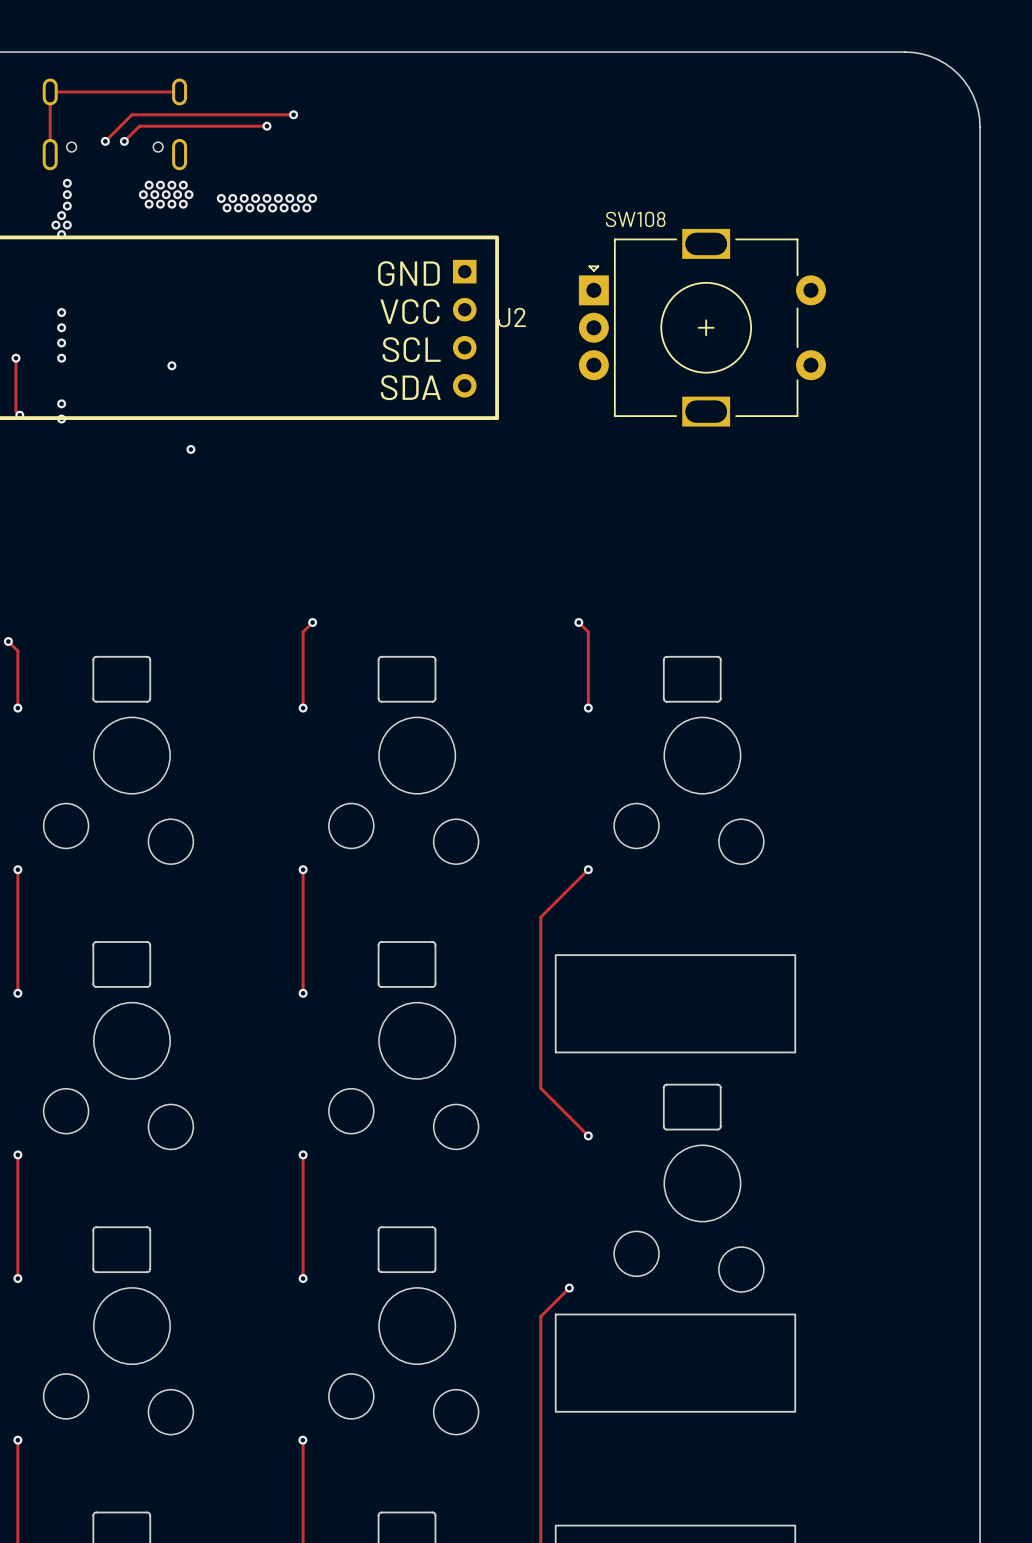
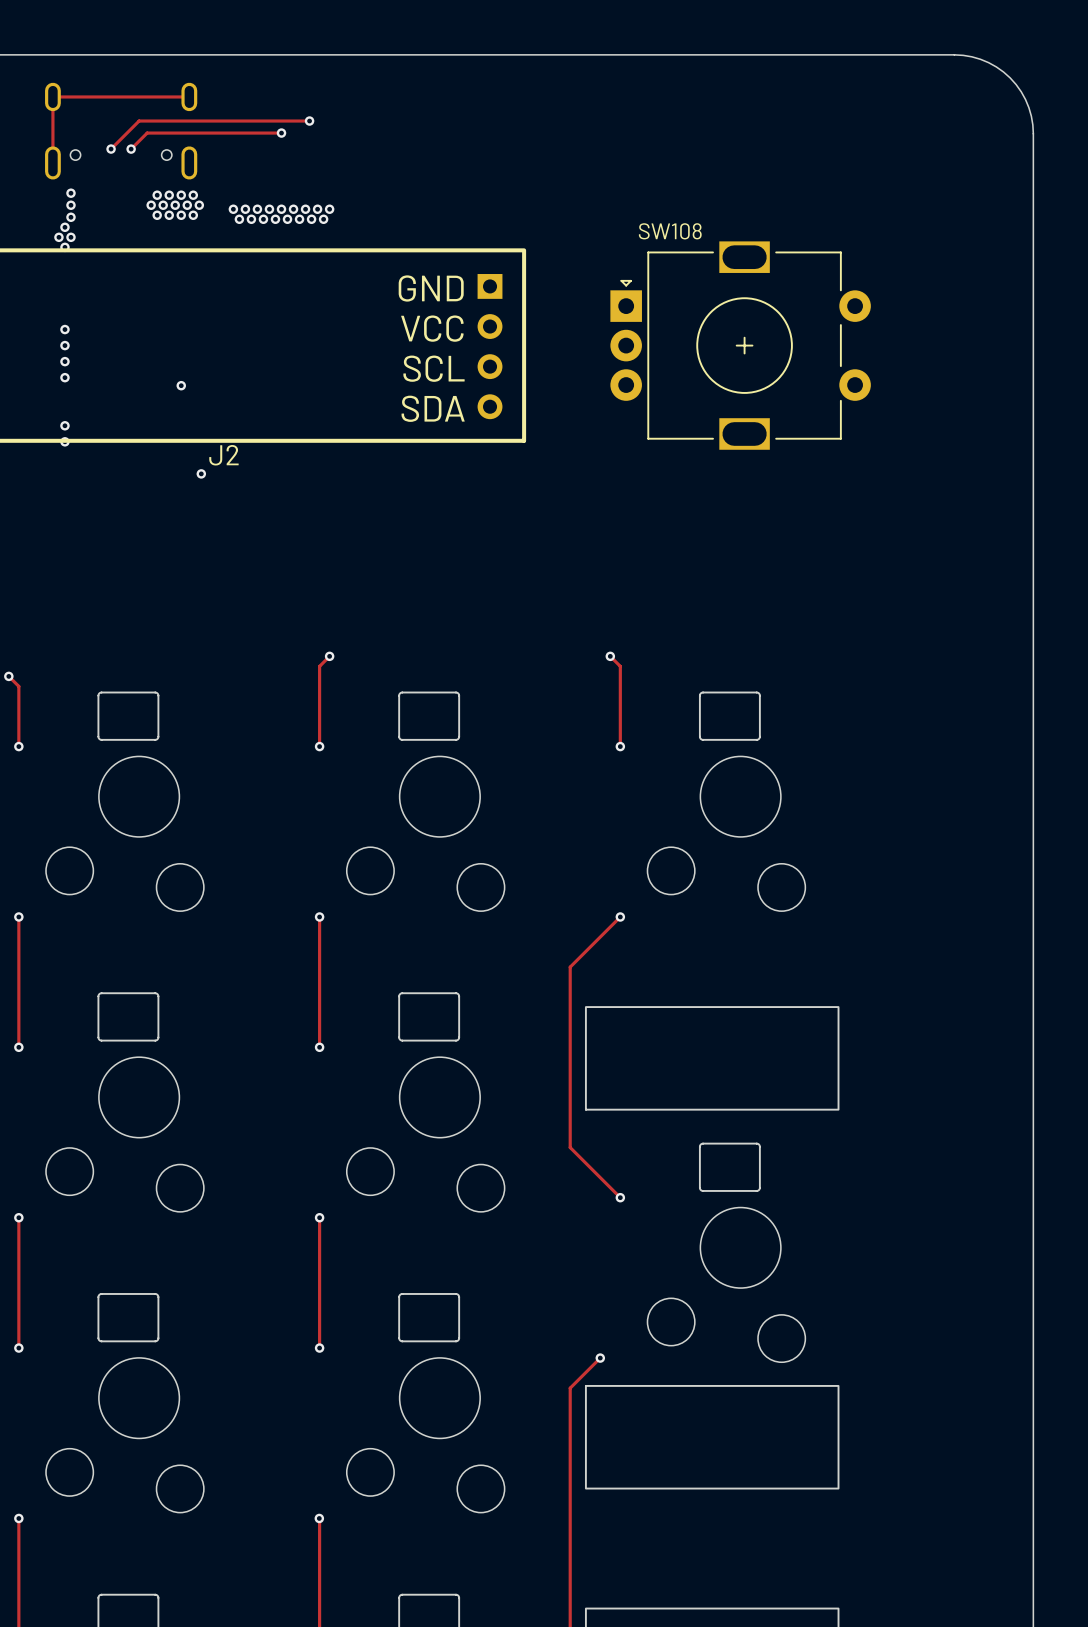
J2 name position: J2 (511, 317) -> J2 (223, 455)
track: (15, 358) (15, 411) (19, 415) -> none
via: (15, 358) -> none
via: (19, 415) -> none

